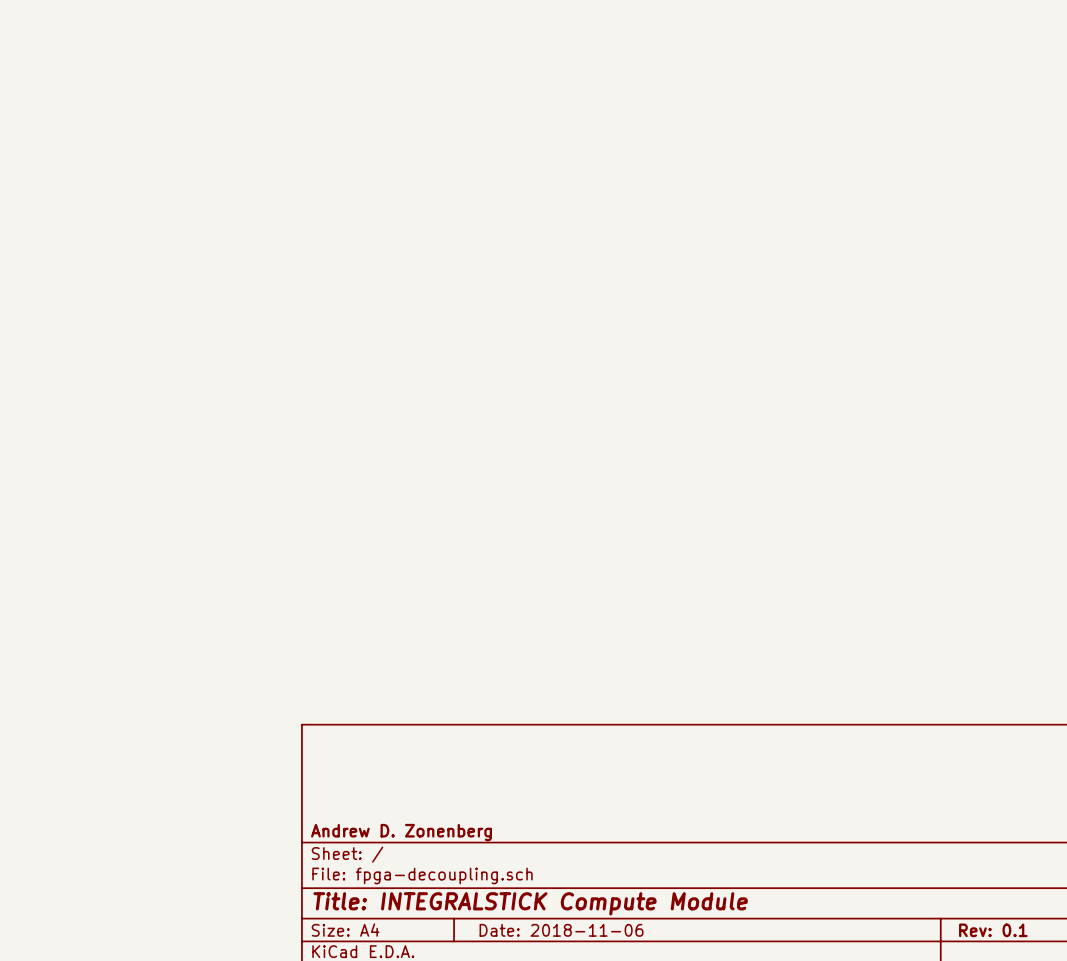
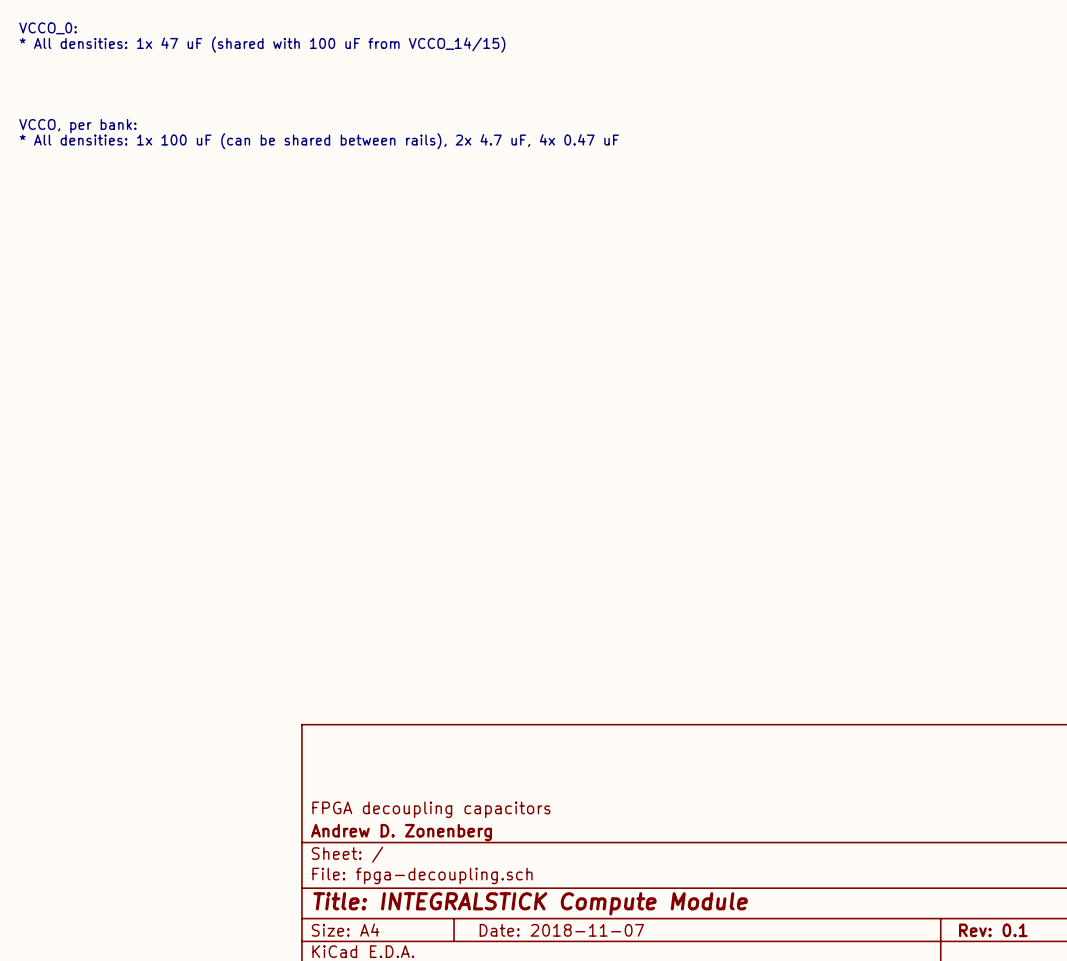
text: none -> VCCO_0: (48, 28)
text: none -> * All densities: 1x 47 uF (shared with 100 uF from VCCO_14/15) (262, 44)
text: none -> VCCO, per bank: (77, 126)
text: none -> * All densities: 1x 100 uF (can be shared between rails), 2x 4.7 uF, 4x 0.47 uF (319, 141)
title block: none -> FPGA decoupling capacitors (431, 809)
title block: Date: 2018-11-06 (561, 930) -> Date: 2018-11-07 (561, 930)

